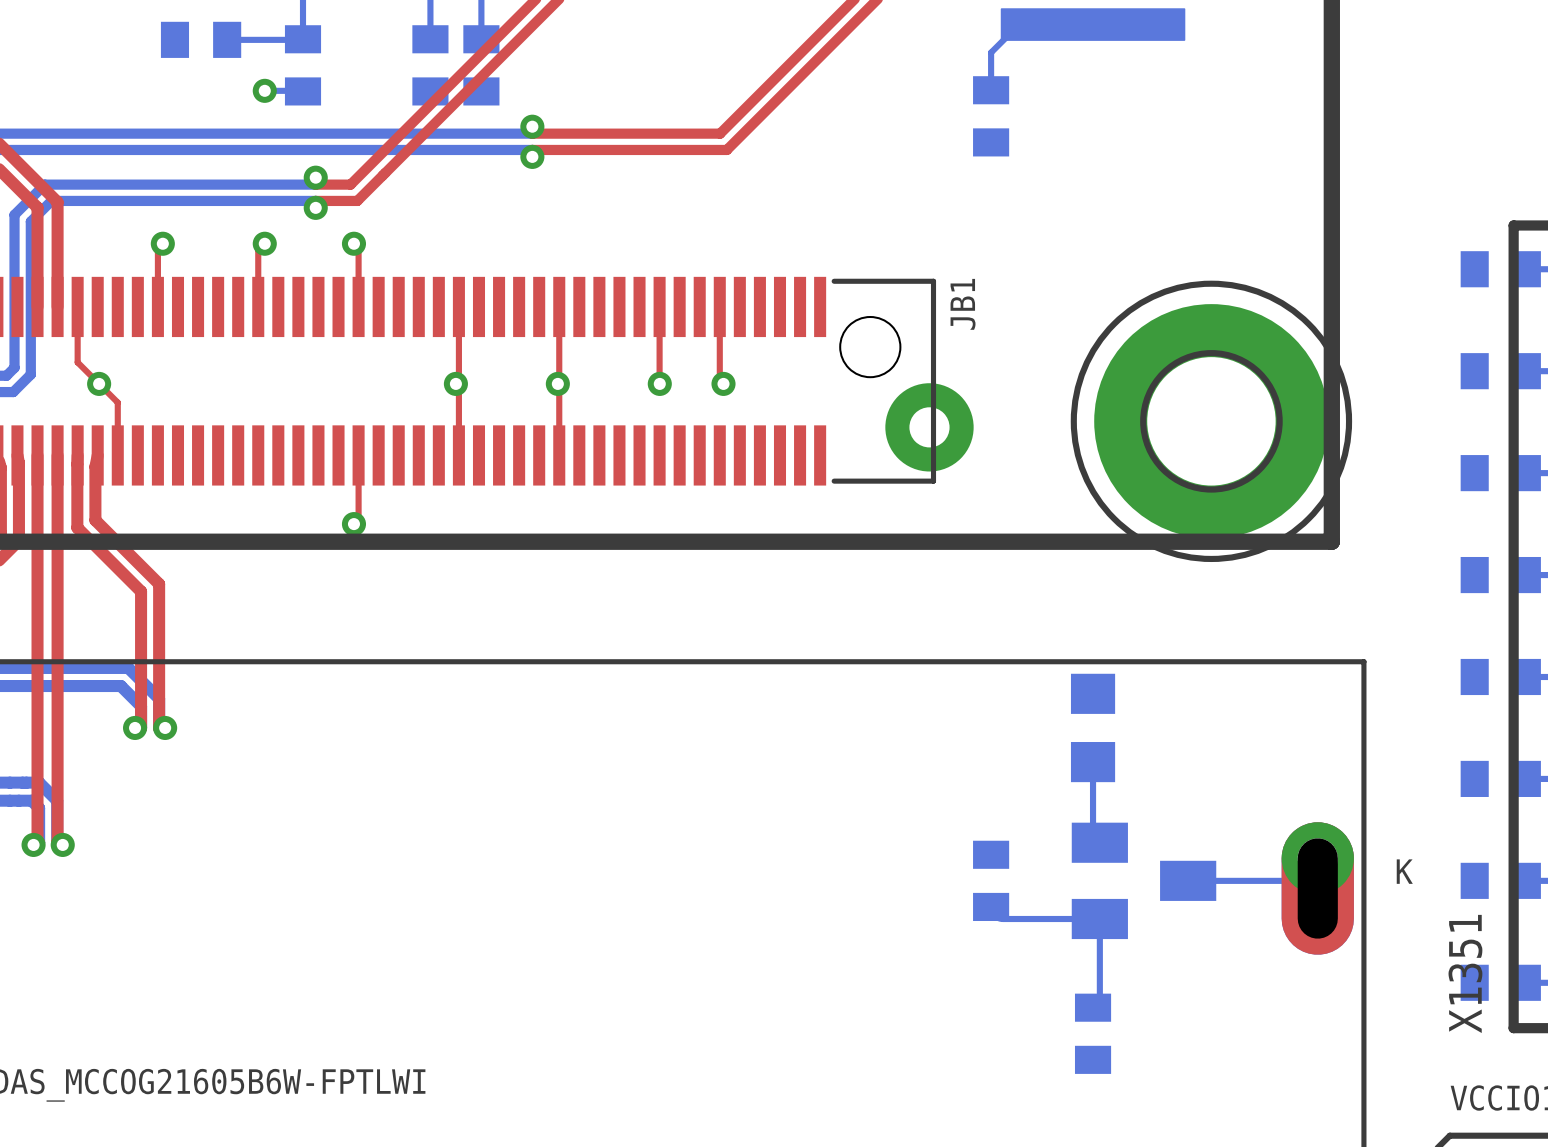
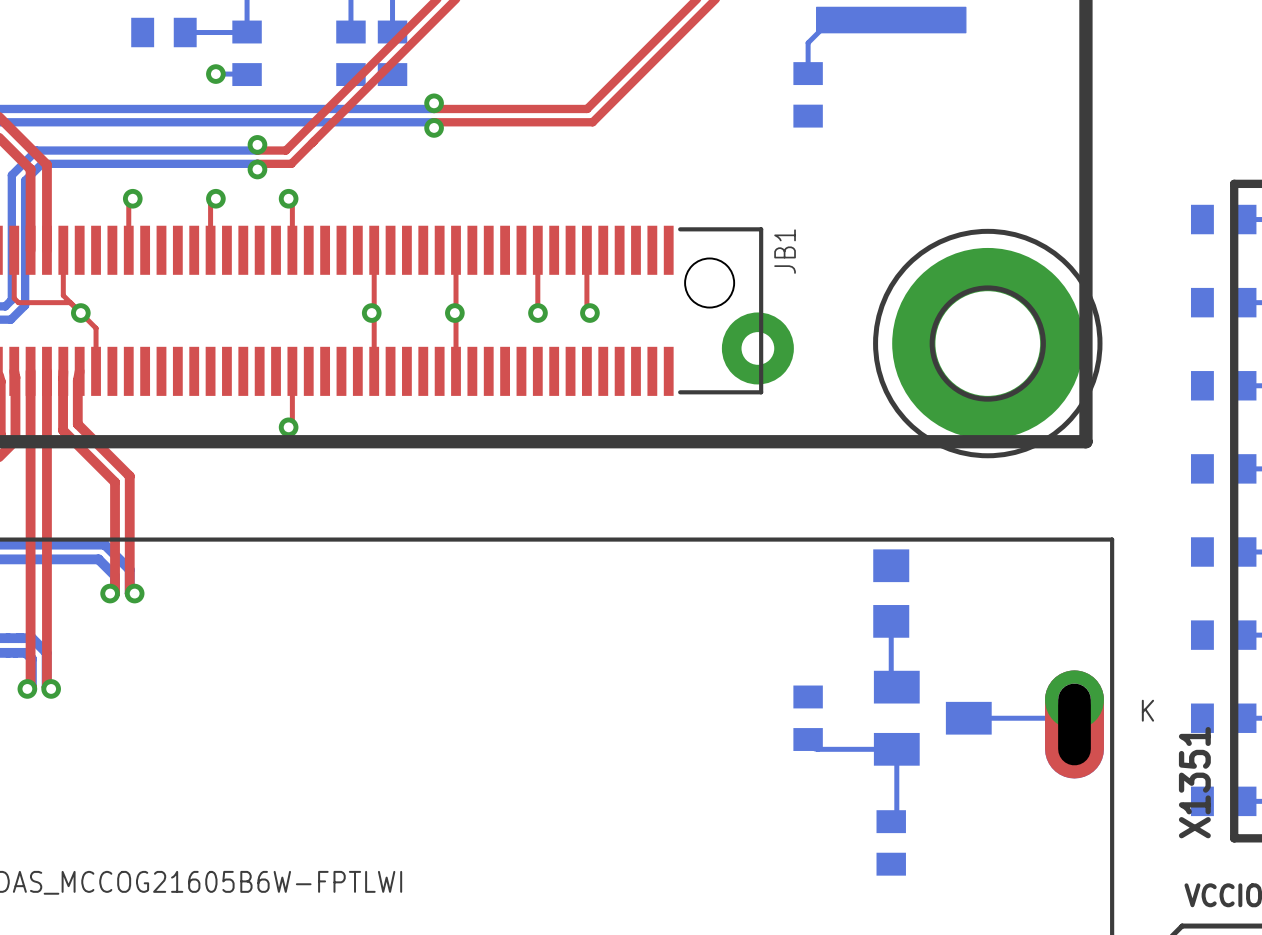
top track: none -> (14, 250) (14, 298) (18, 302) (70, 302)

